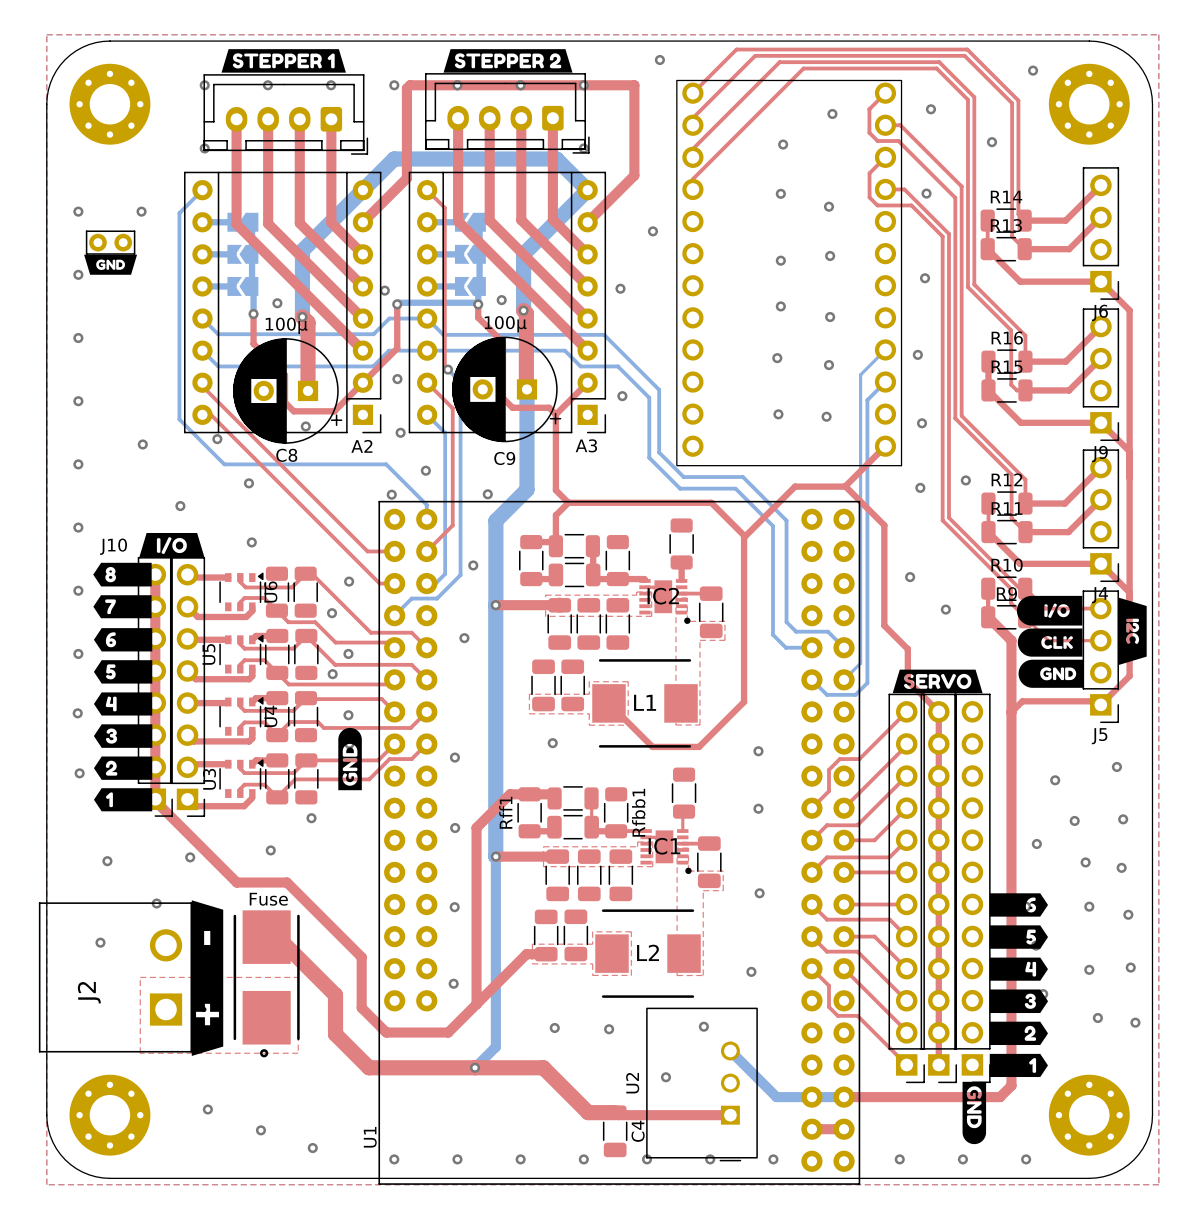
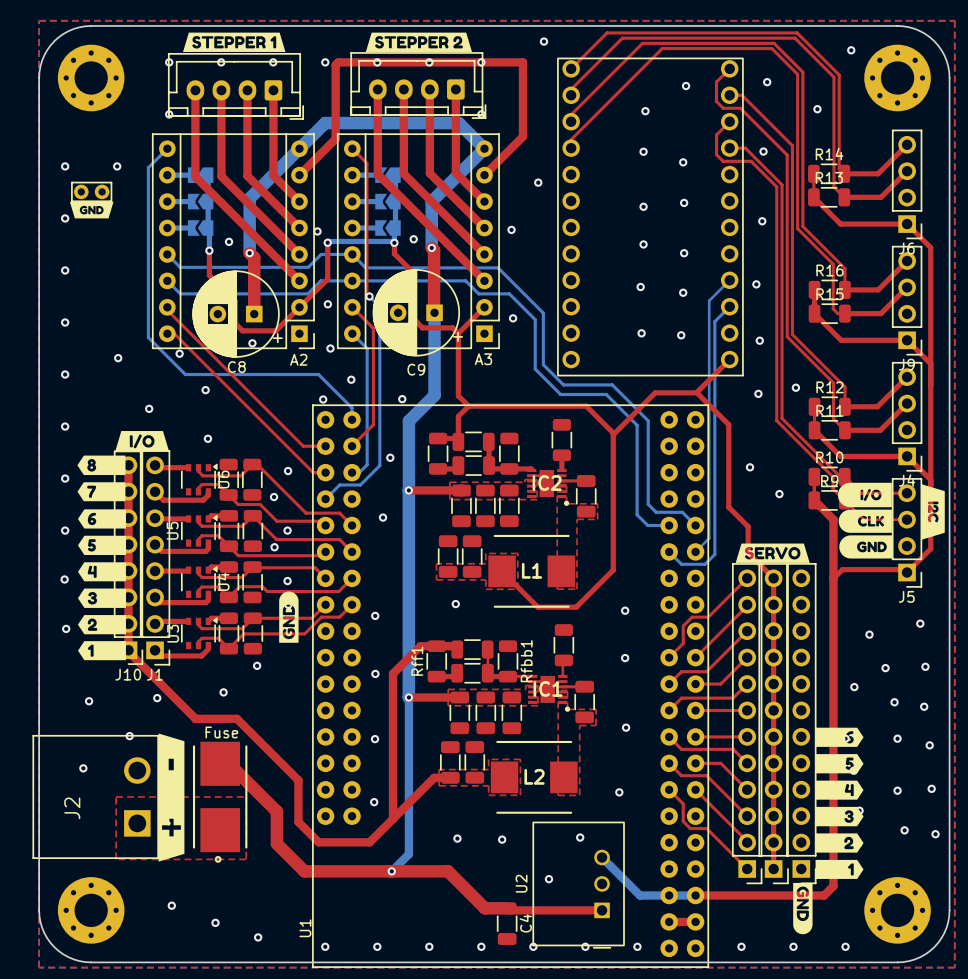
C9 value: 100µ (505, 324) -> none
C8 value: 100µ (286, 325) -> none
J10 name position: J10 (113, 546) -> J10 (128, 674)
part: (187, 687) -> none
J1: none -> (155, 557)

